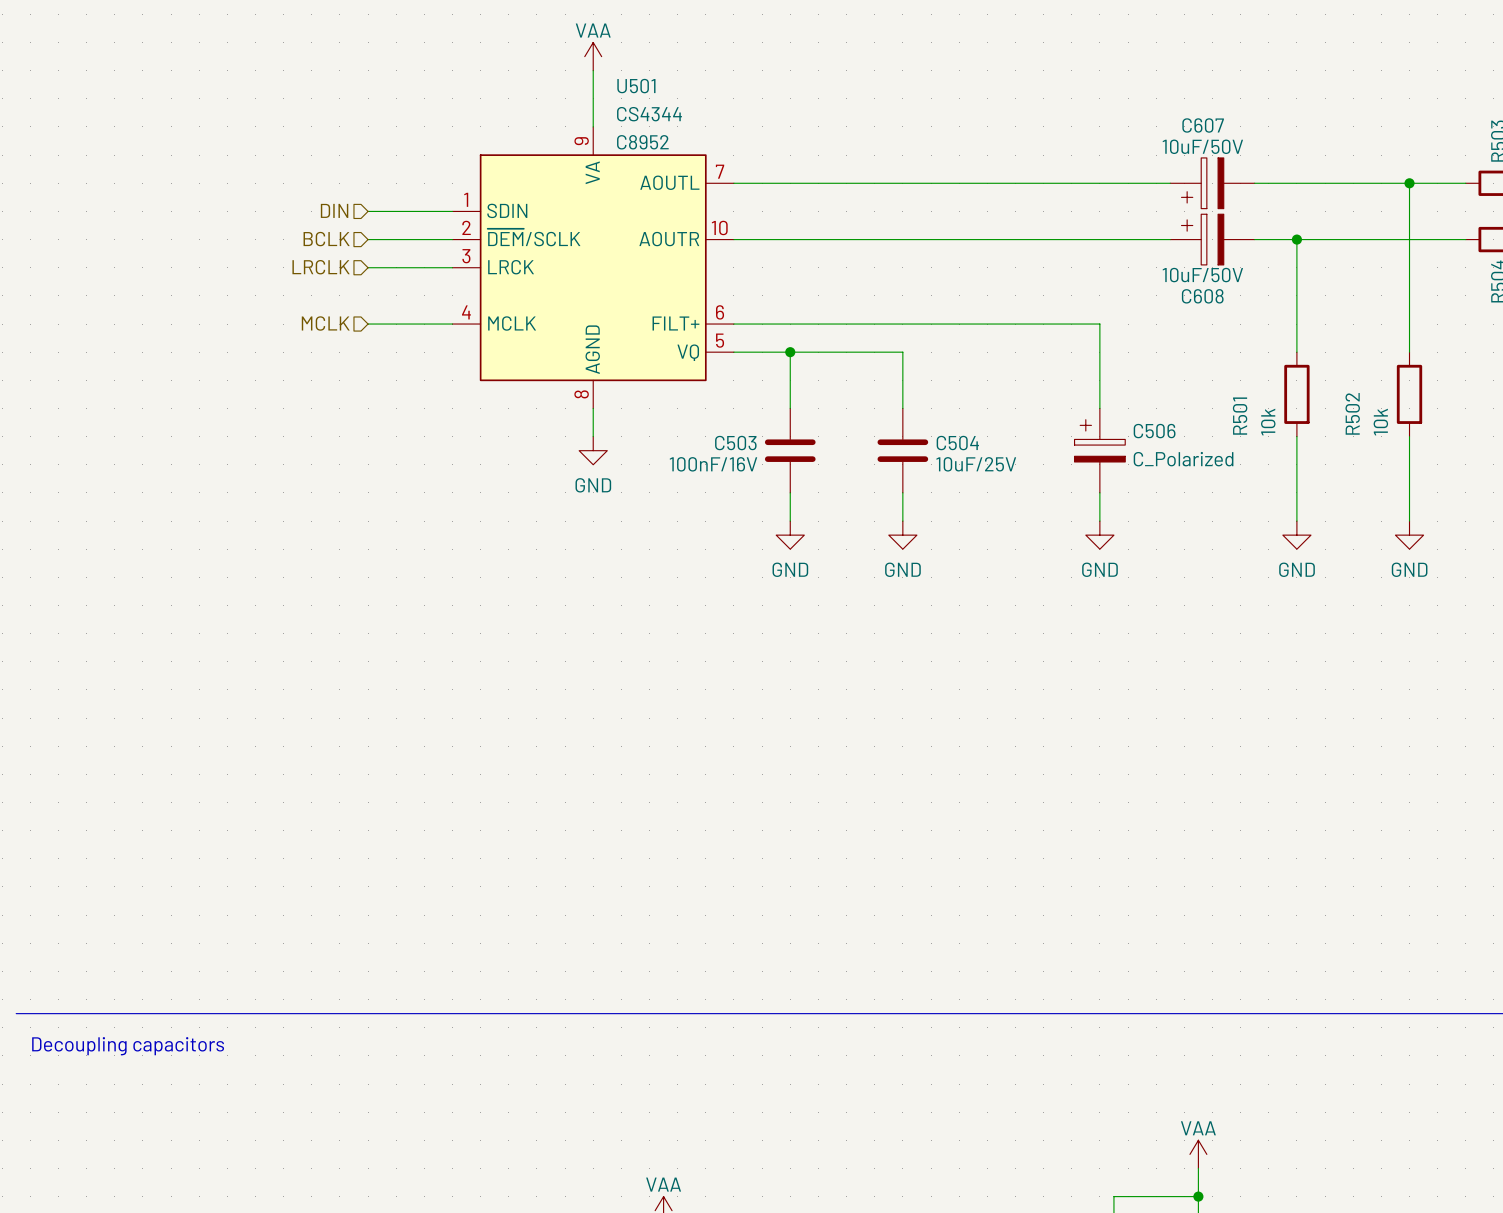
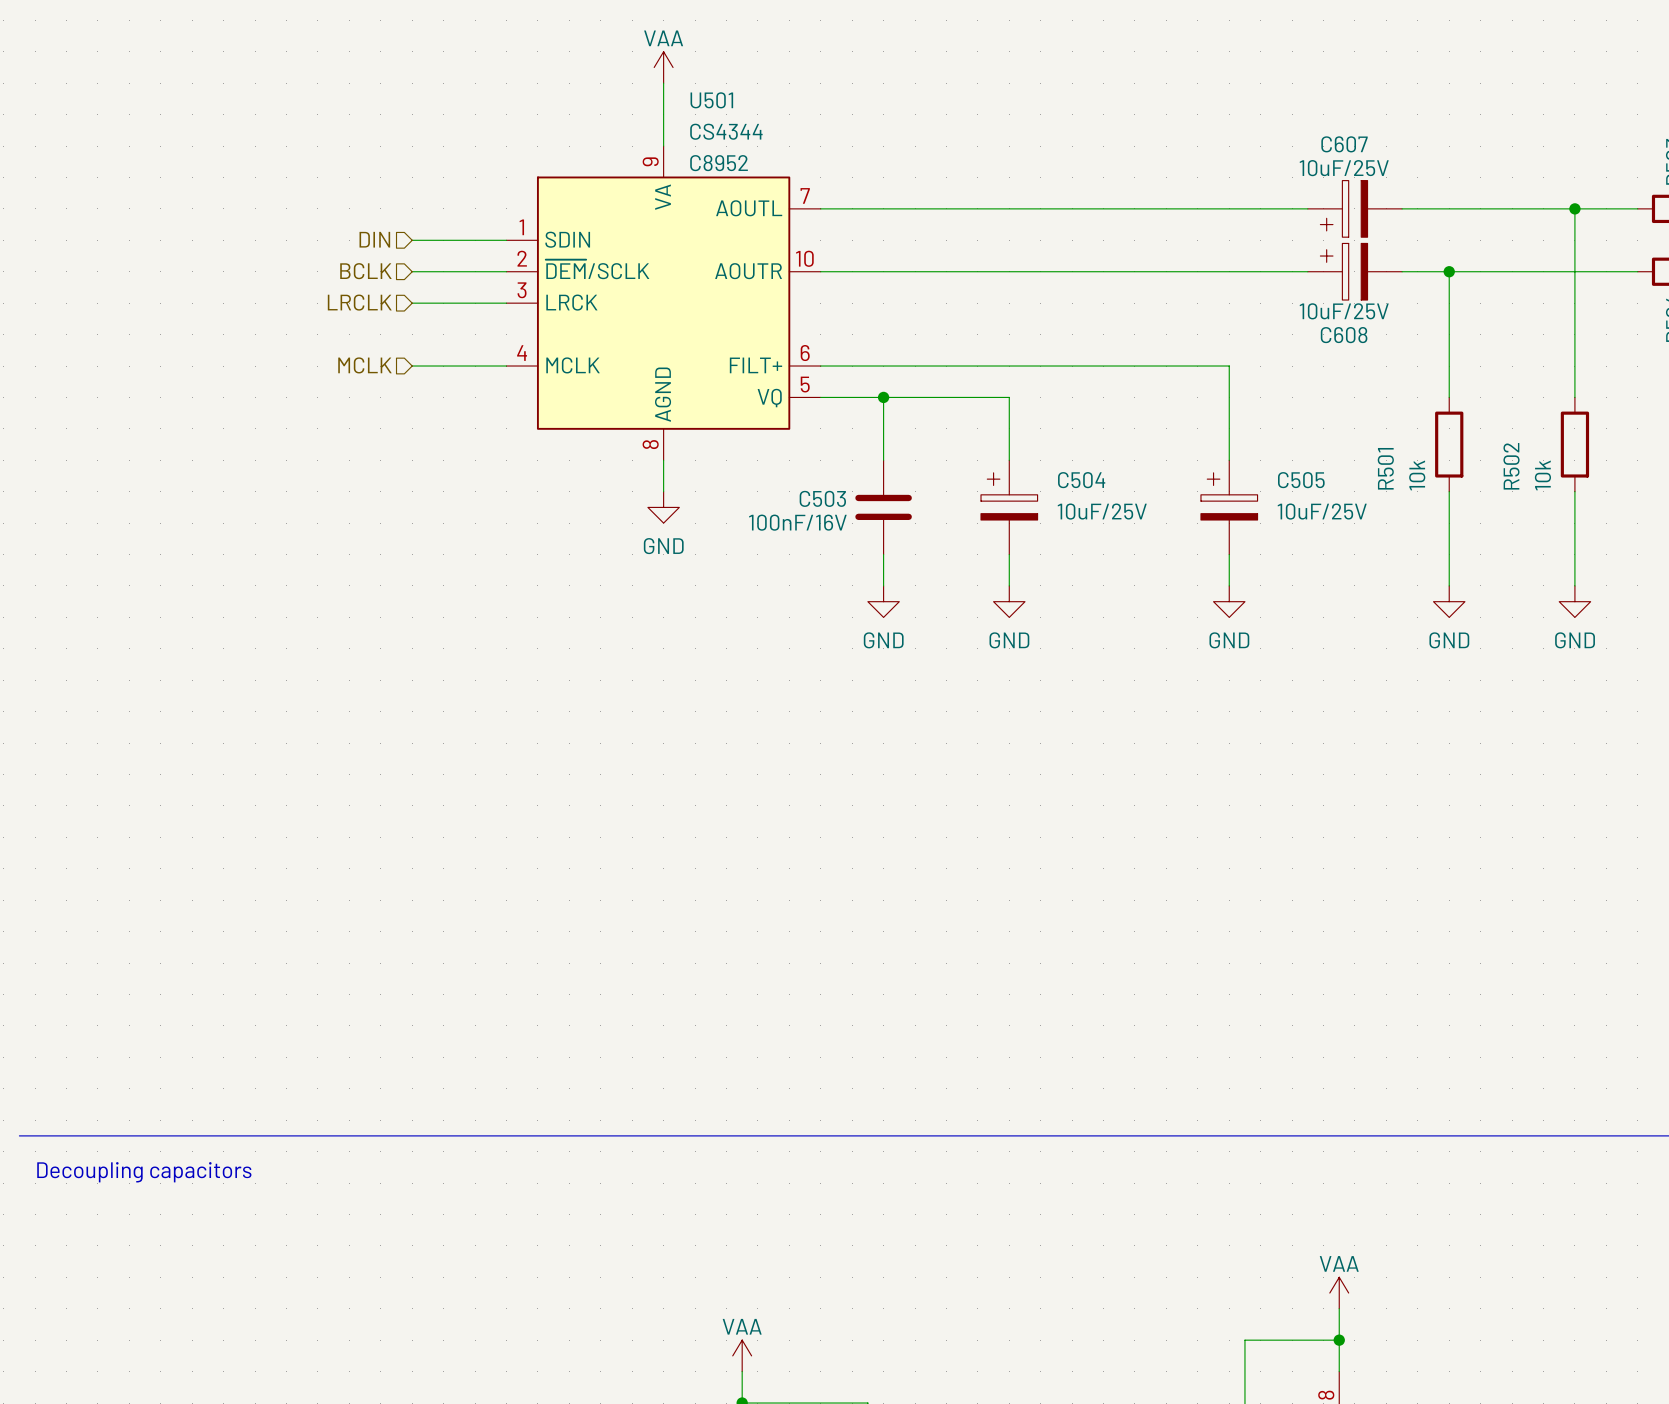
C607 value: 10uF/50V (1202, 146) -> 10uF/25V (1344, 168)
C608 value: 10uF/50V (1202, 275) -> 10uF/25V (1344, 311)
C504 symbol: [877, 408, 929, 493] -> [981, 460, 1038, 555]
C506 name: C506 (1154, 431) -> C505 (1301, 480)
C506 value: C_Polarized (1183, 459) -> 10uF/25V (1322, 511)

